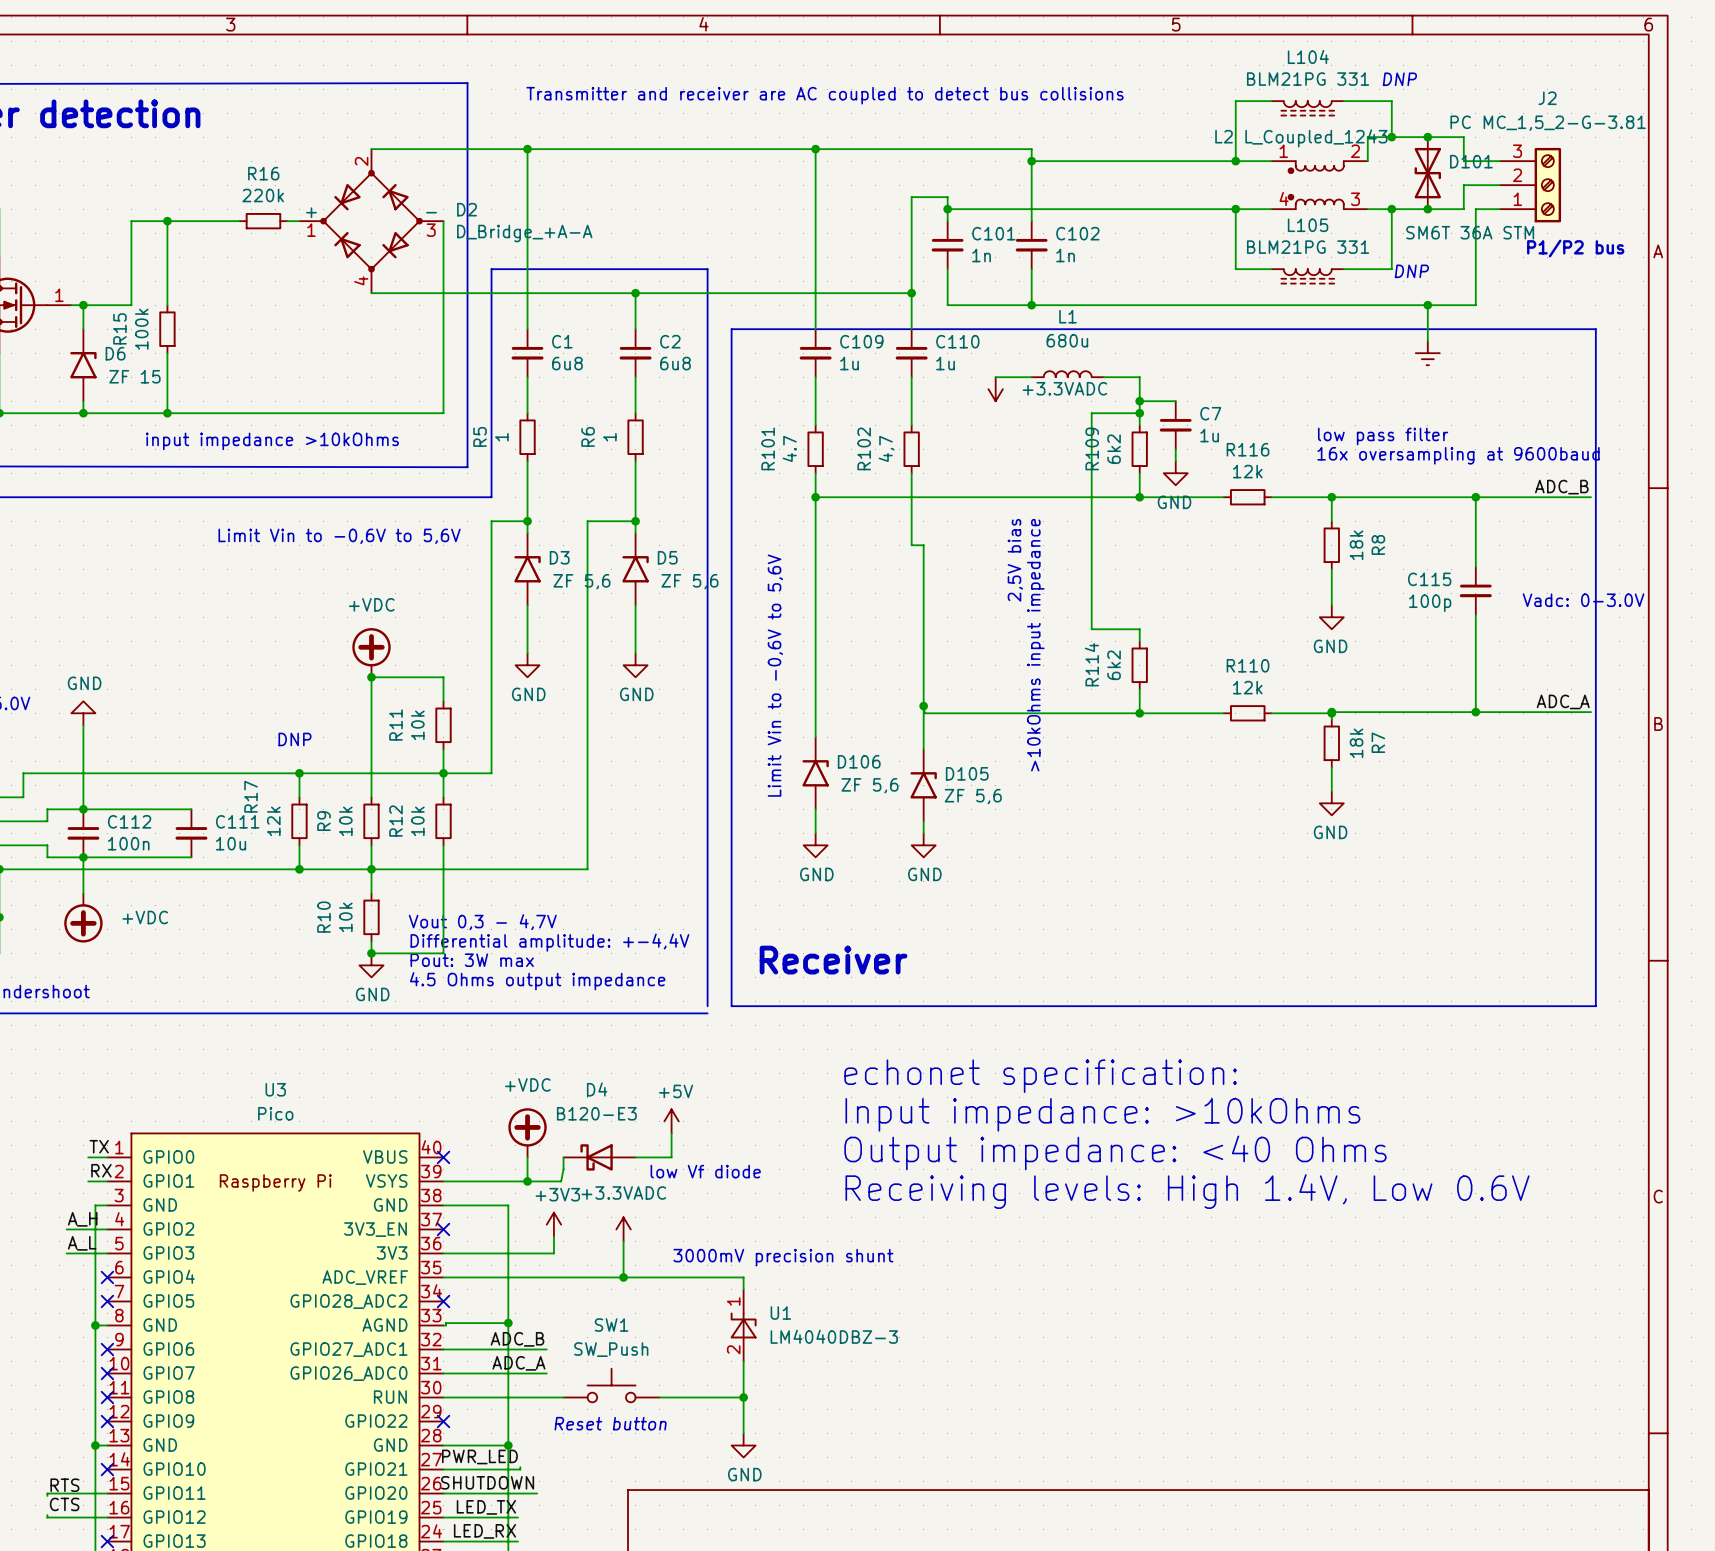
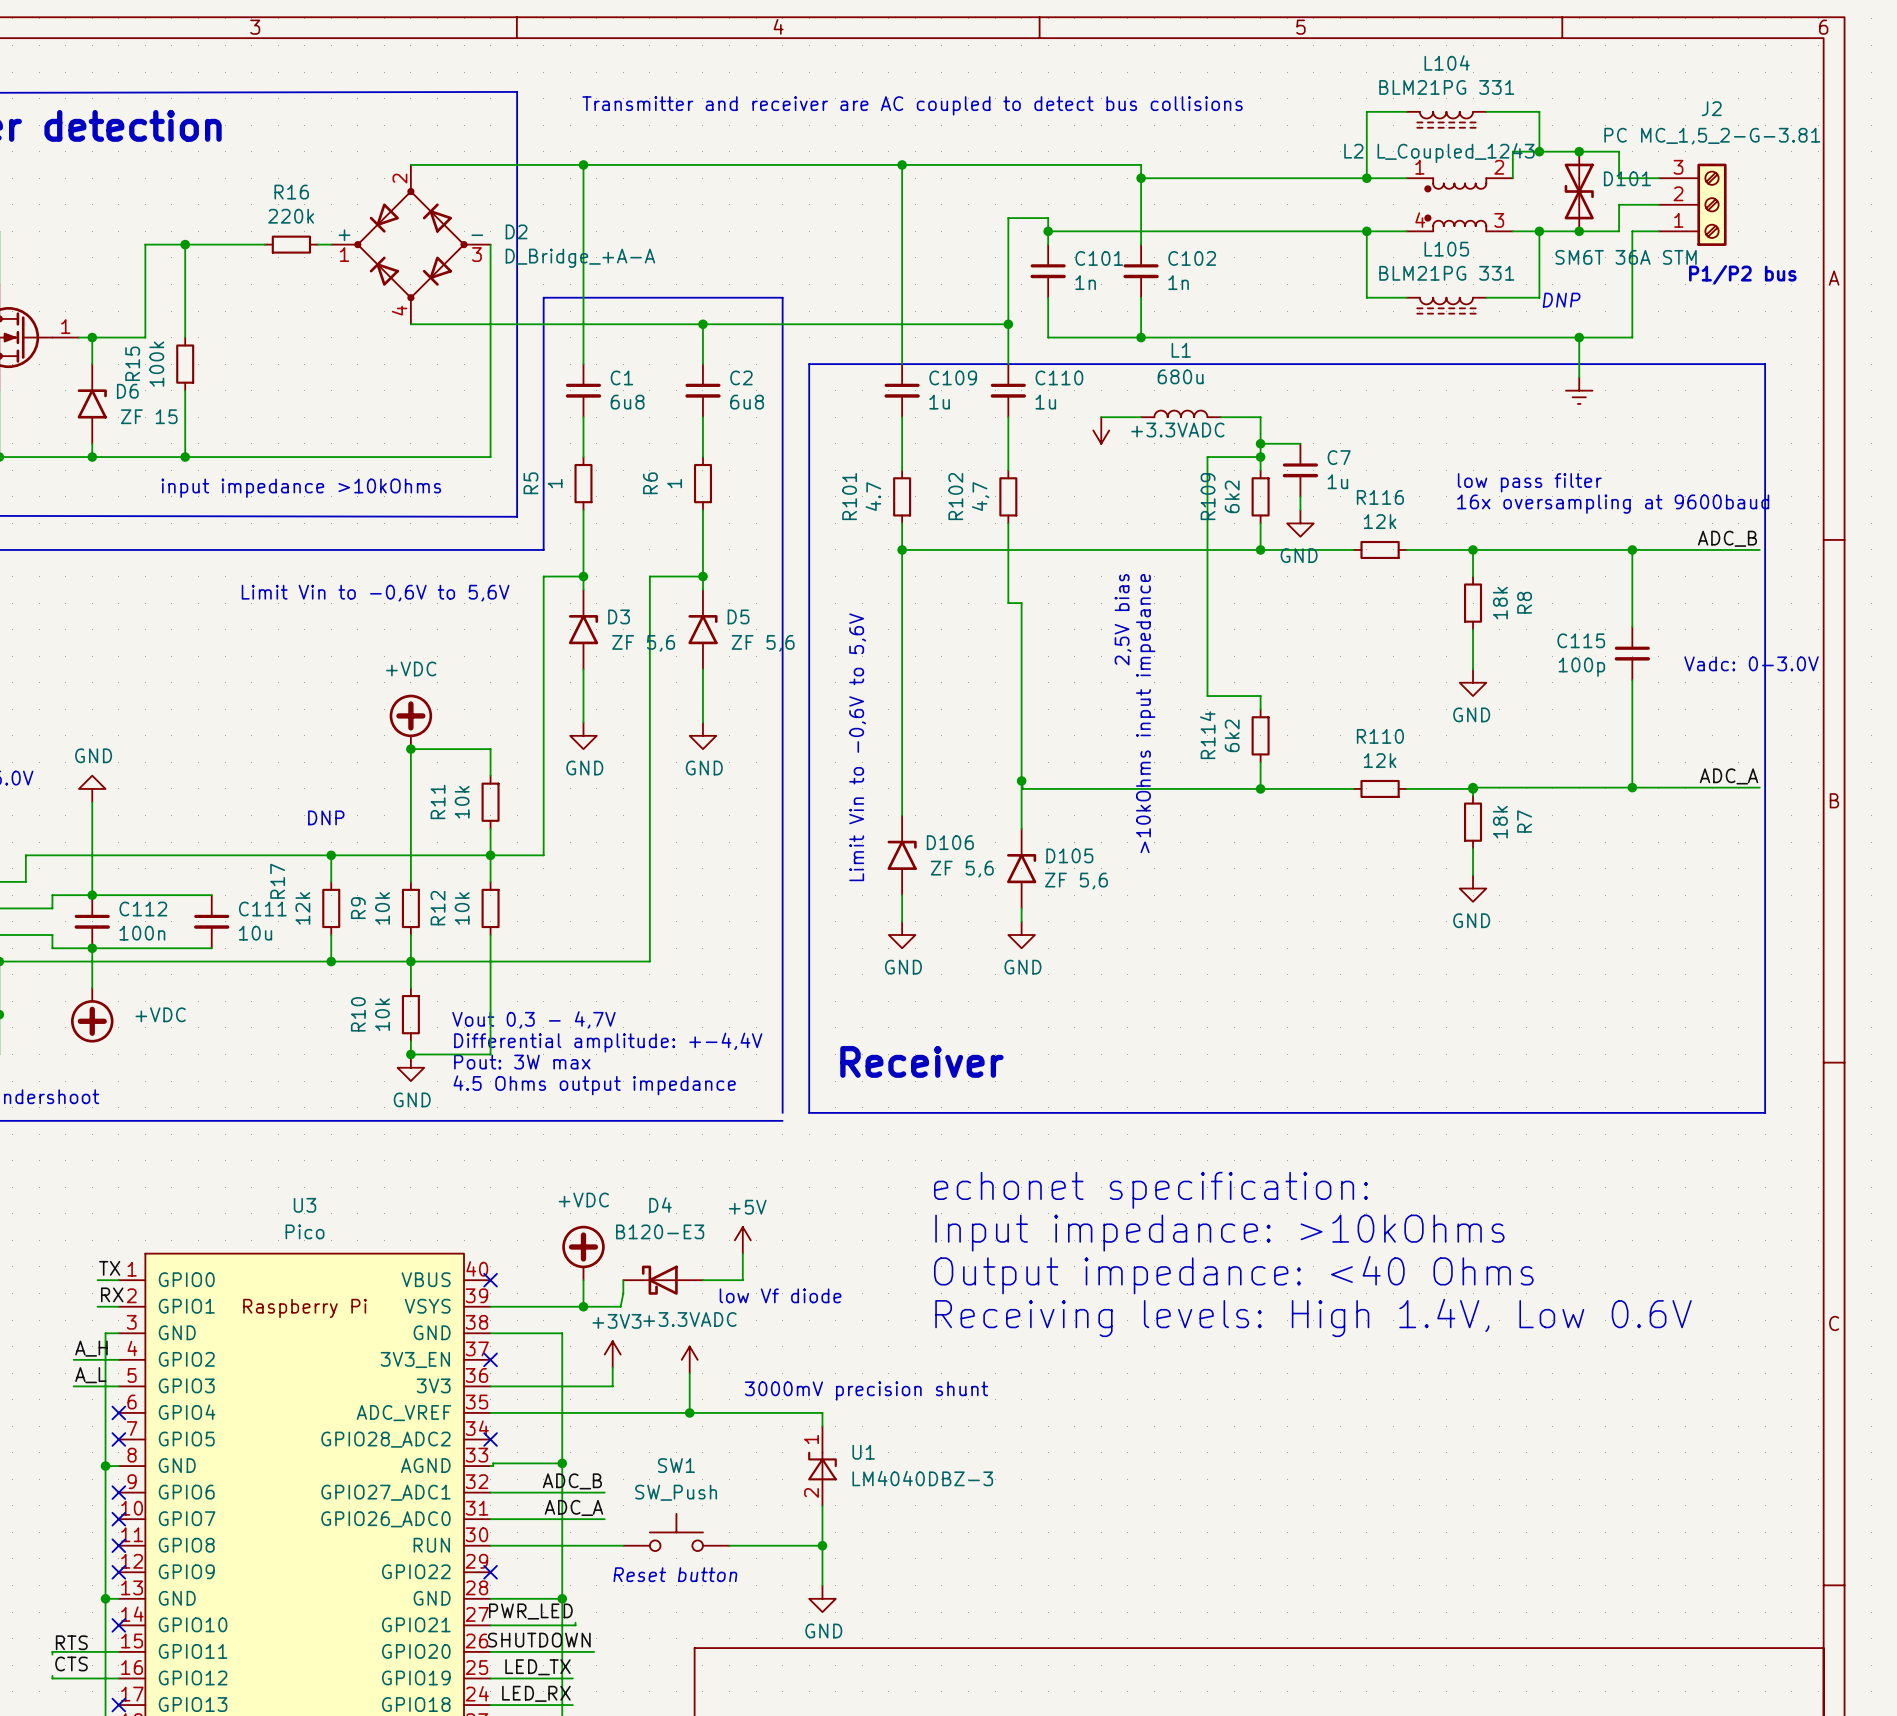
text: DNP (1399, 79) -> none

